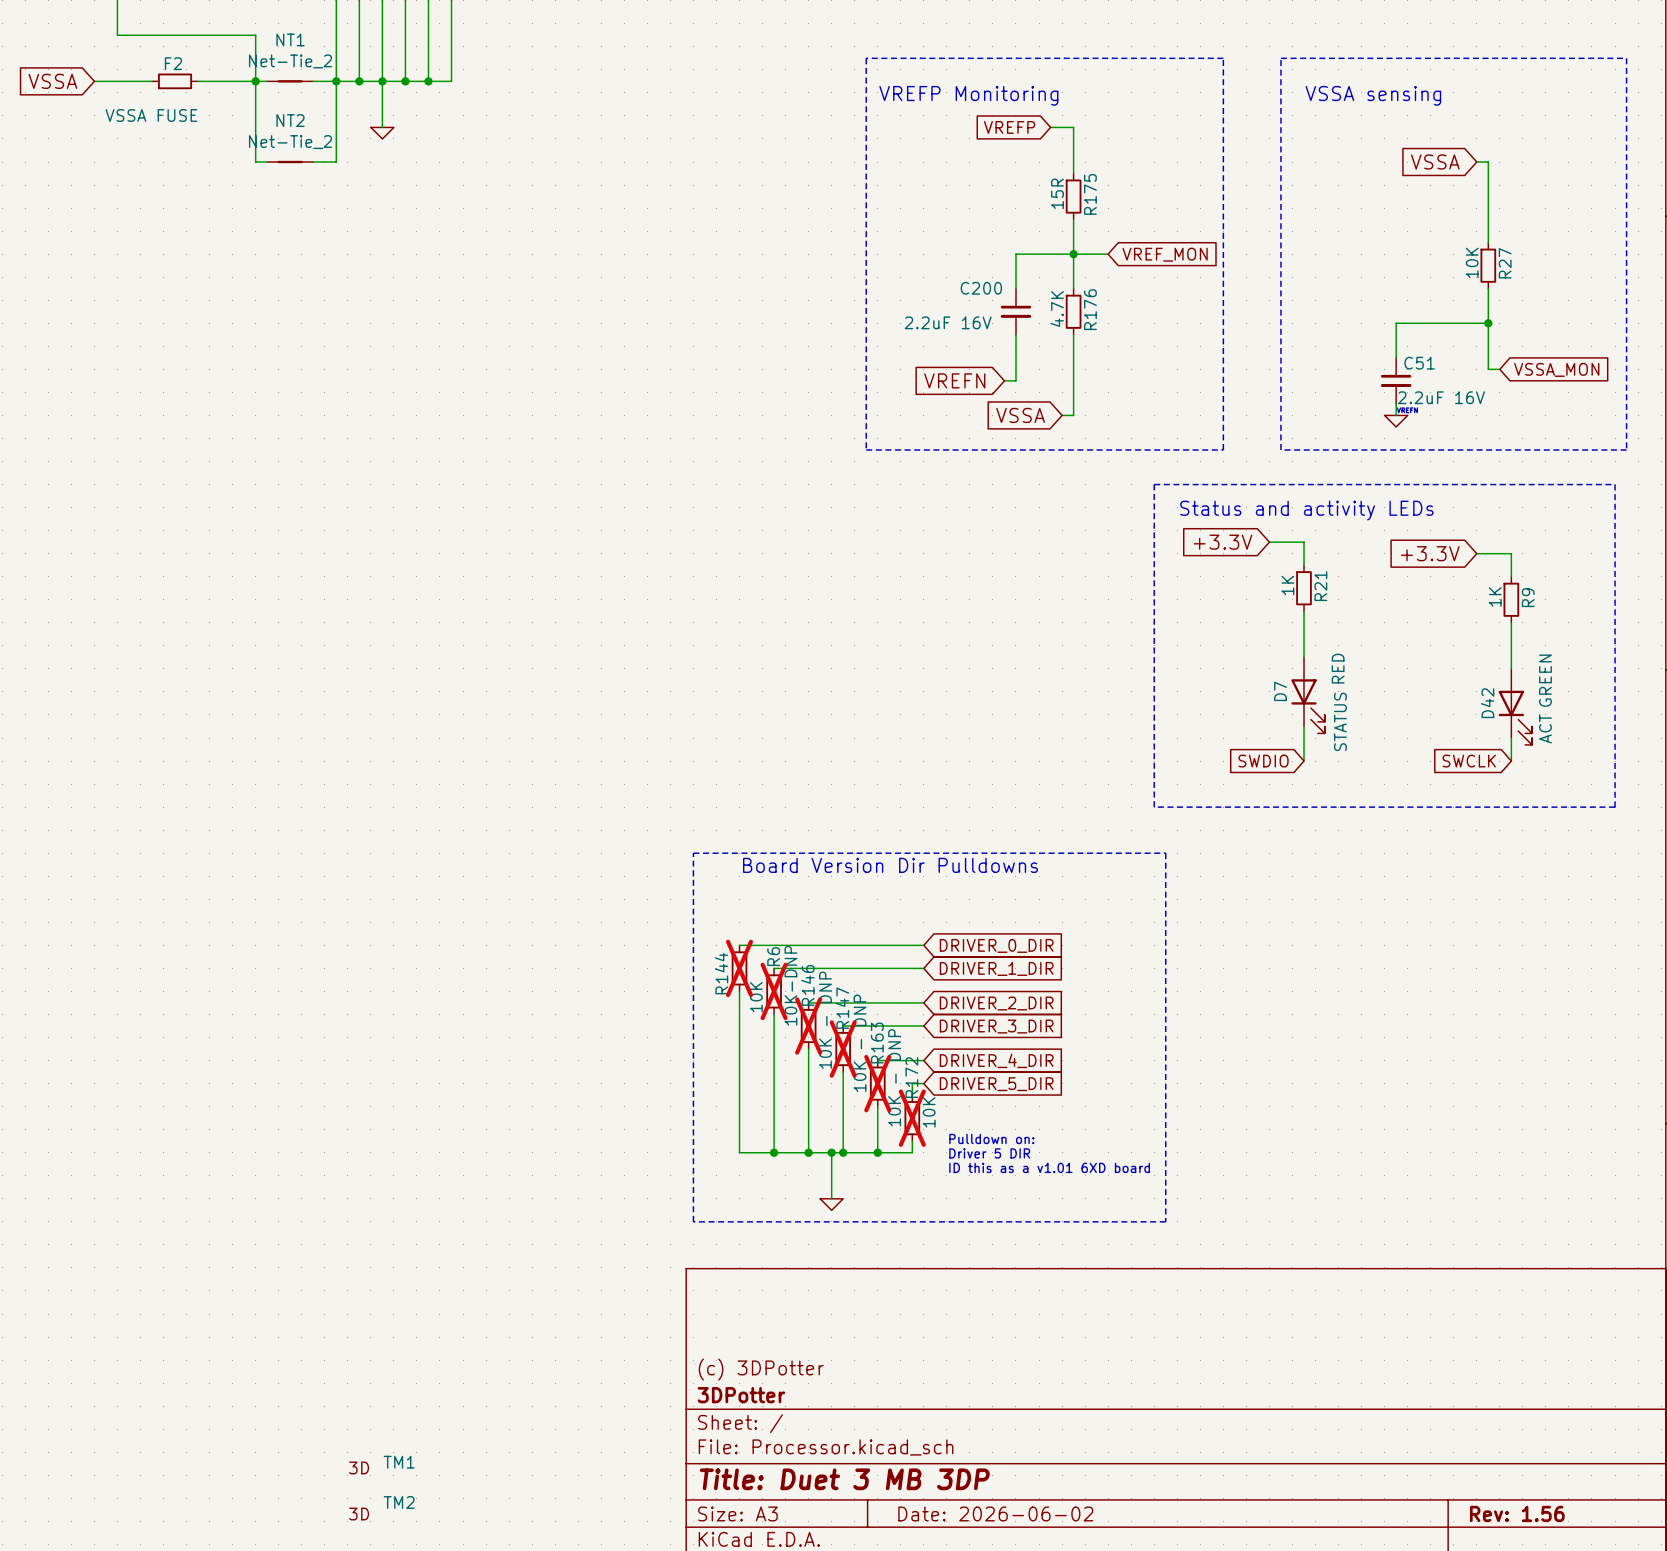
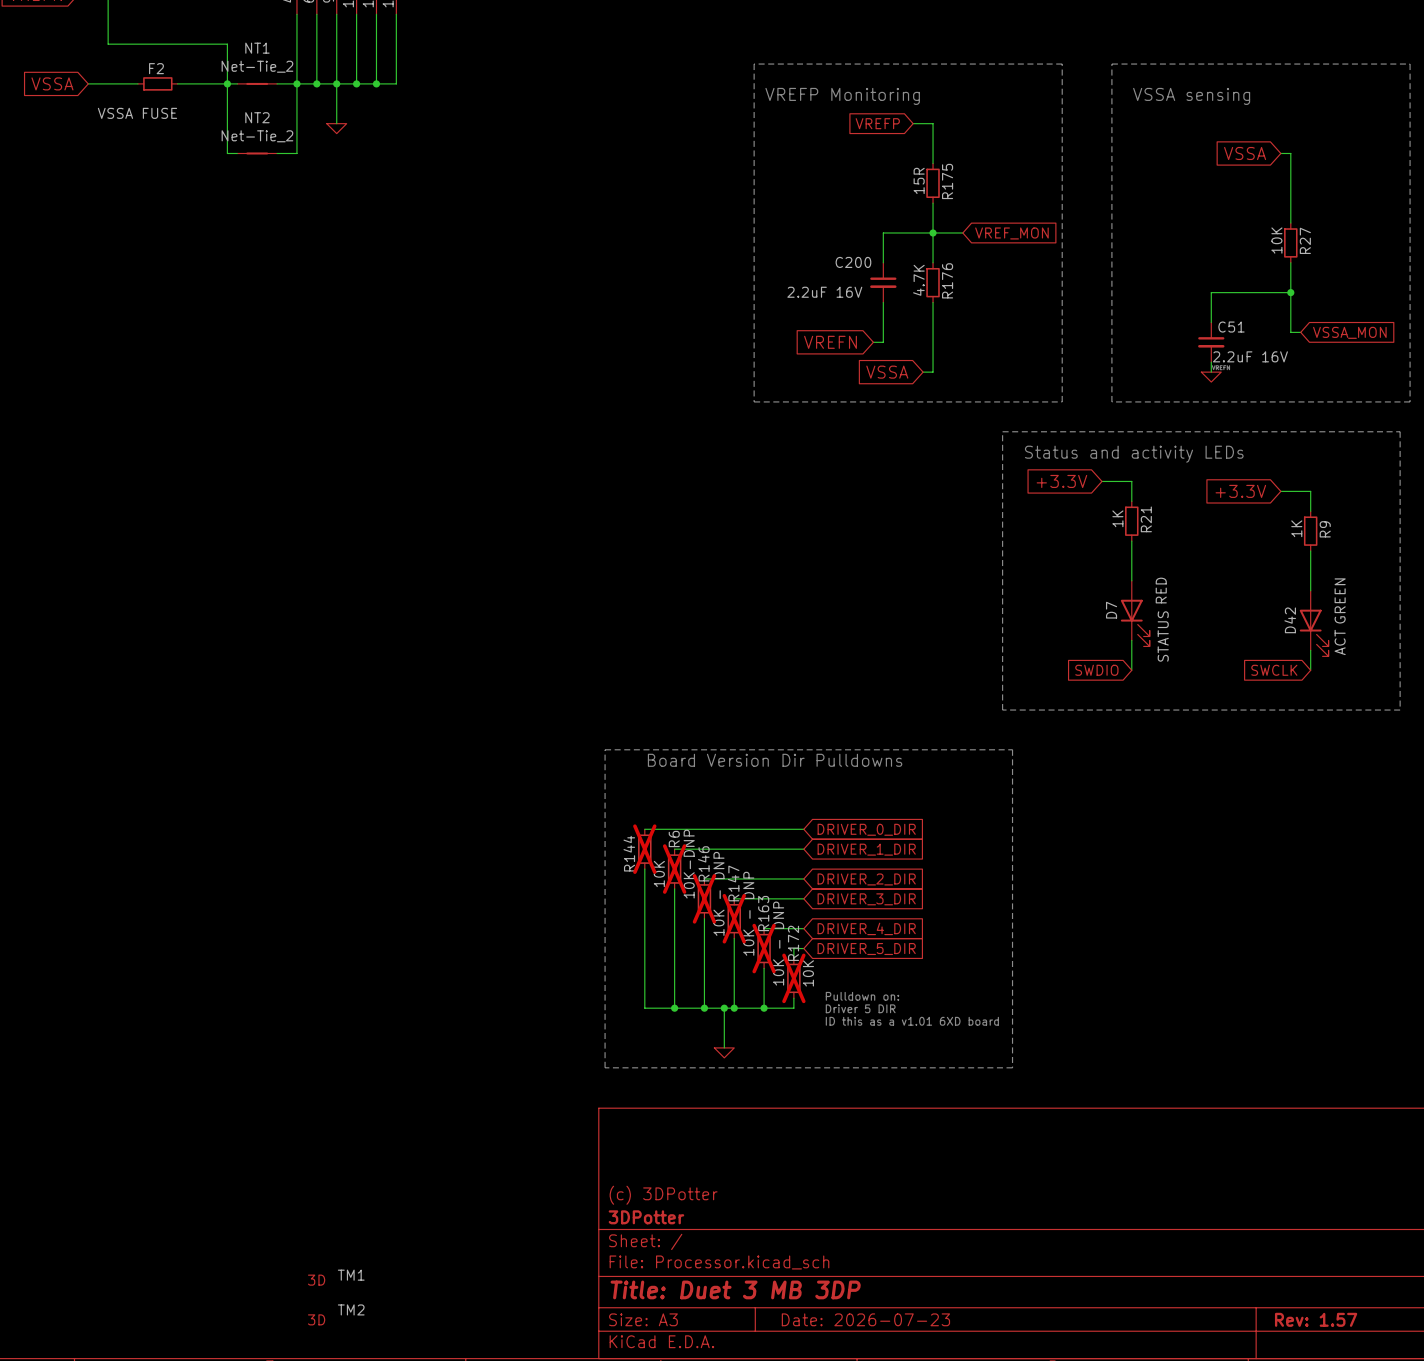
title block: Date: 2026-06-02 (995, 1513) -> Date: 2026-07-23 (865, 1319)
title block: Rev: 1.56 (1517, 1513) -> Rev: 1.57 (1316, 1319)

